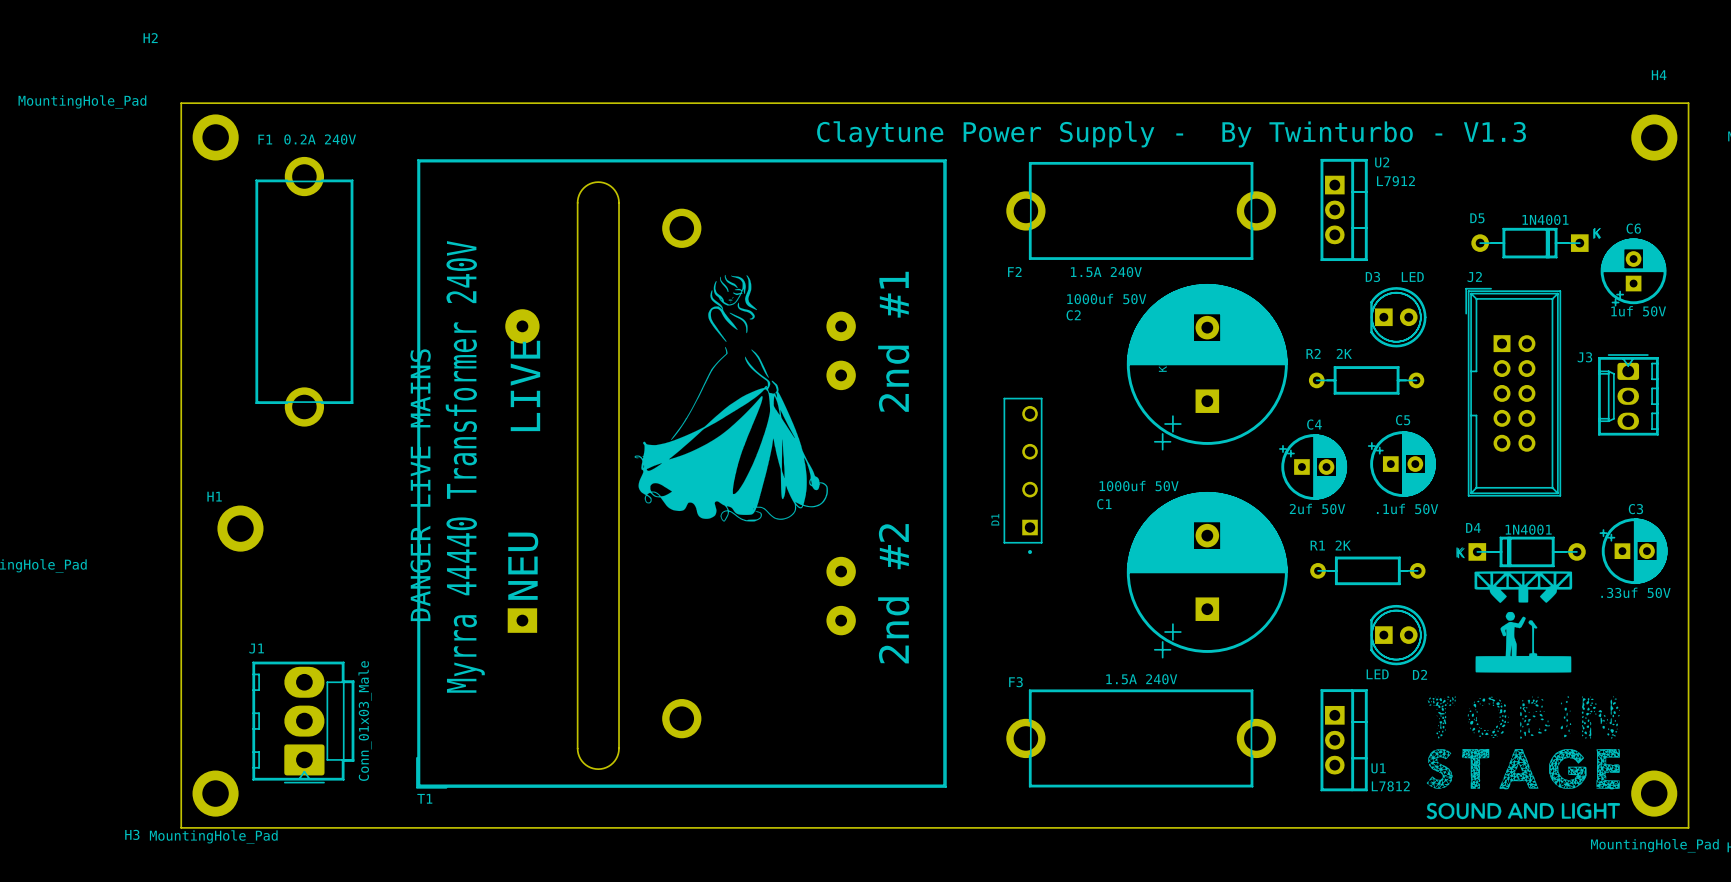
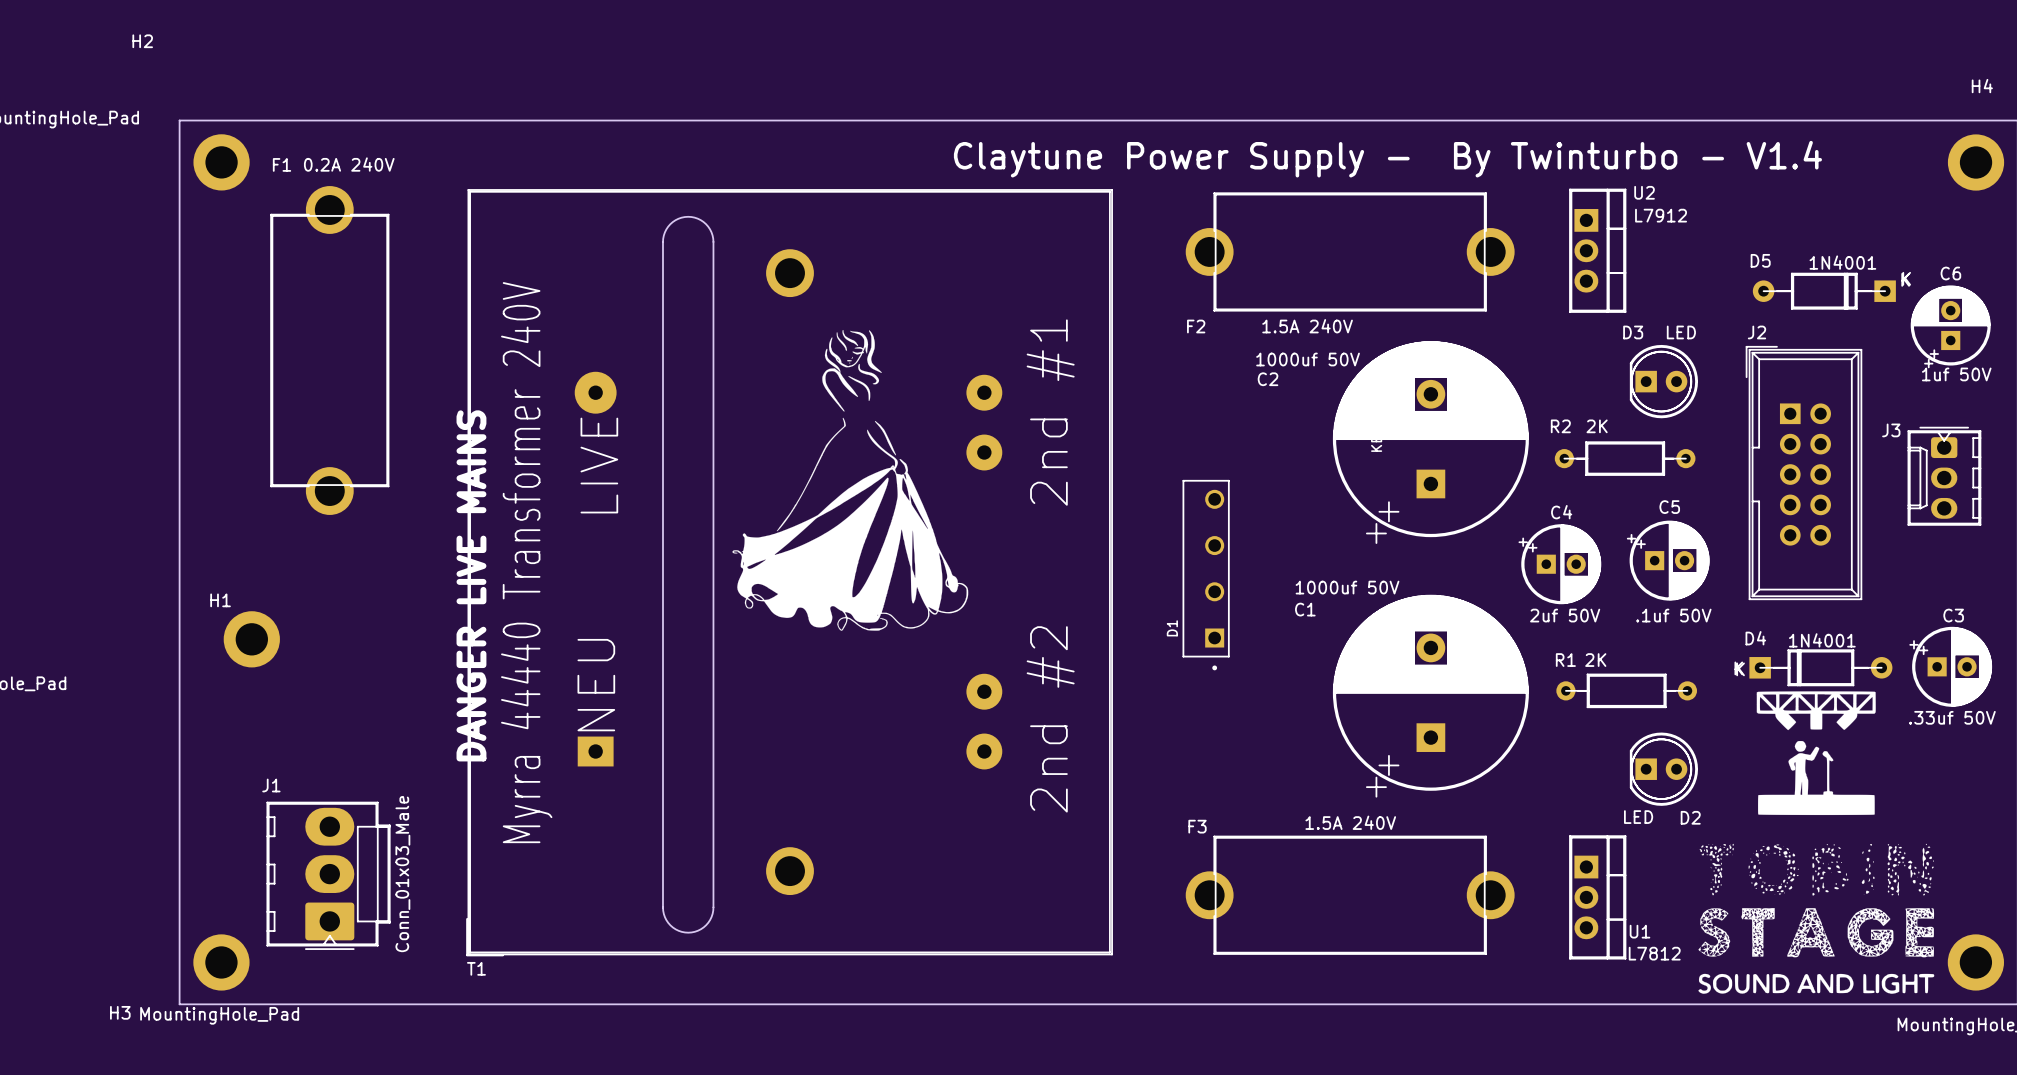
text: Claytune Power Supply - By Twinturbo - V1.3 (1171, 134) -> Claytune Power Supply - By Twinturbo - V1.4 (1387, 159)

